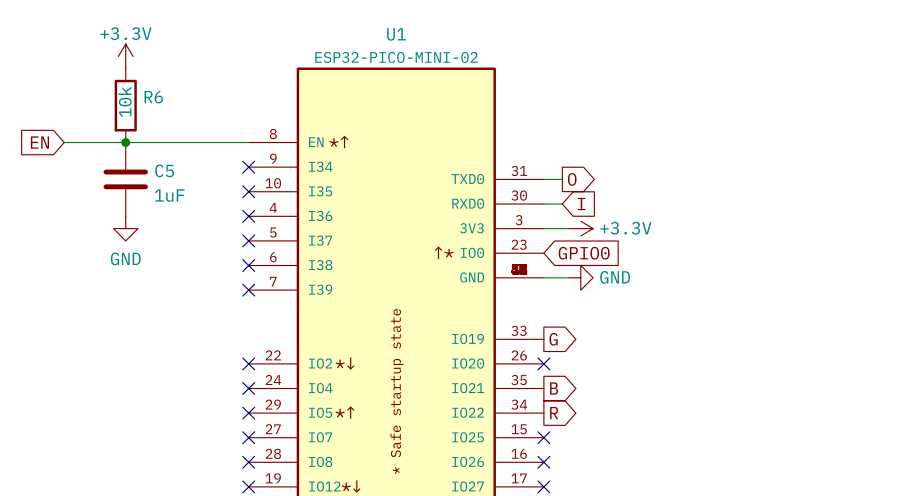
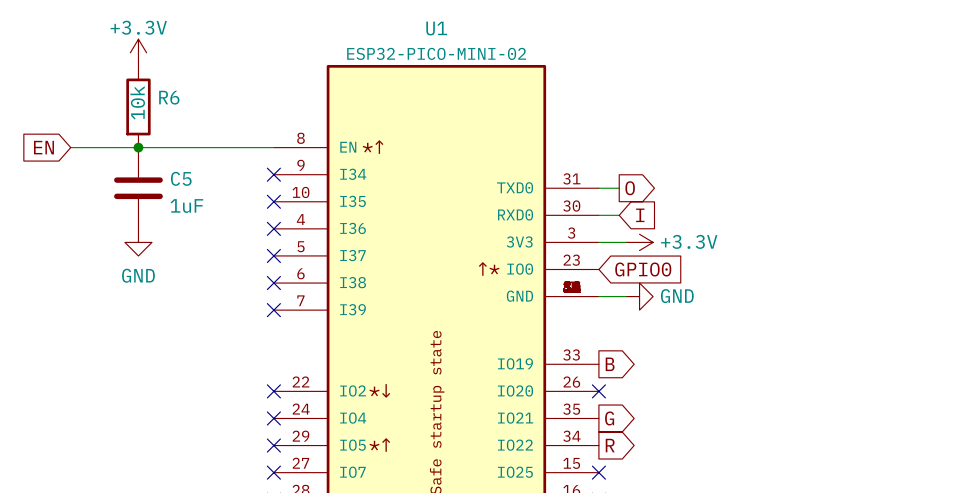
global label: G (553, 339) -> B (610, 364)
global label: B (554, 388) -> G (609, 418)

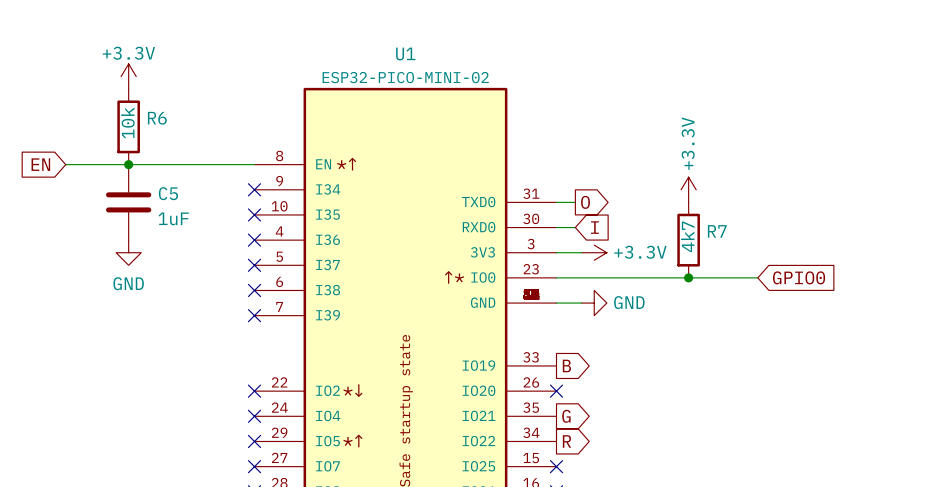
power symbol: none -> +3.3V (688, 189)
R7: none -> 4k7 (688, 240)
wire: none -> (556, 277) (757, 277)
global label position: GPIO0 (643, 269) -> GPIO0 (799, 277)
junction: none -> (688, 277)

